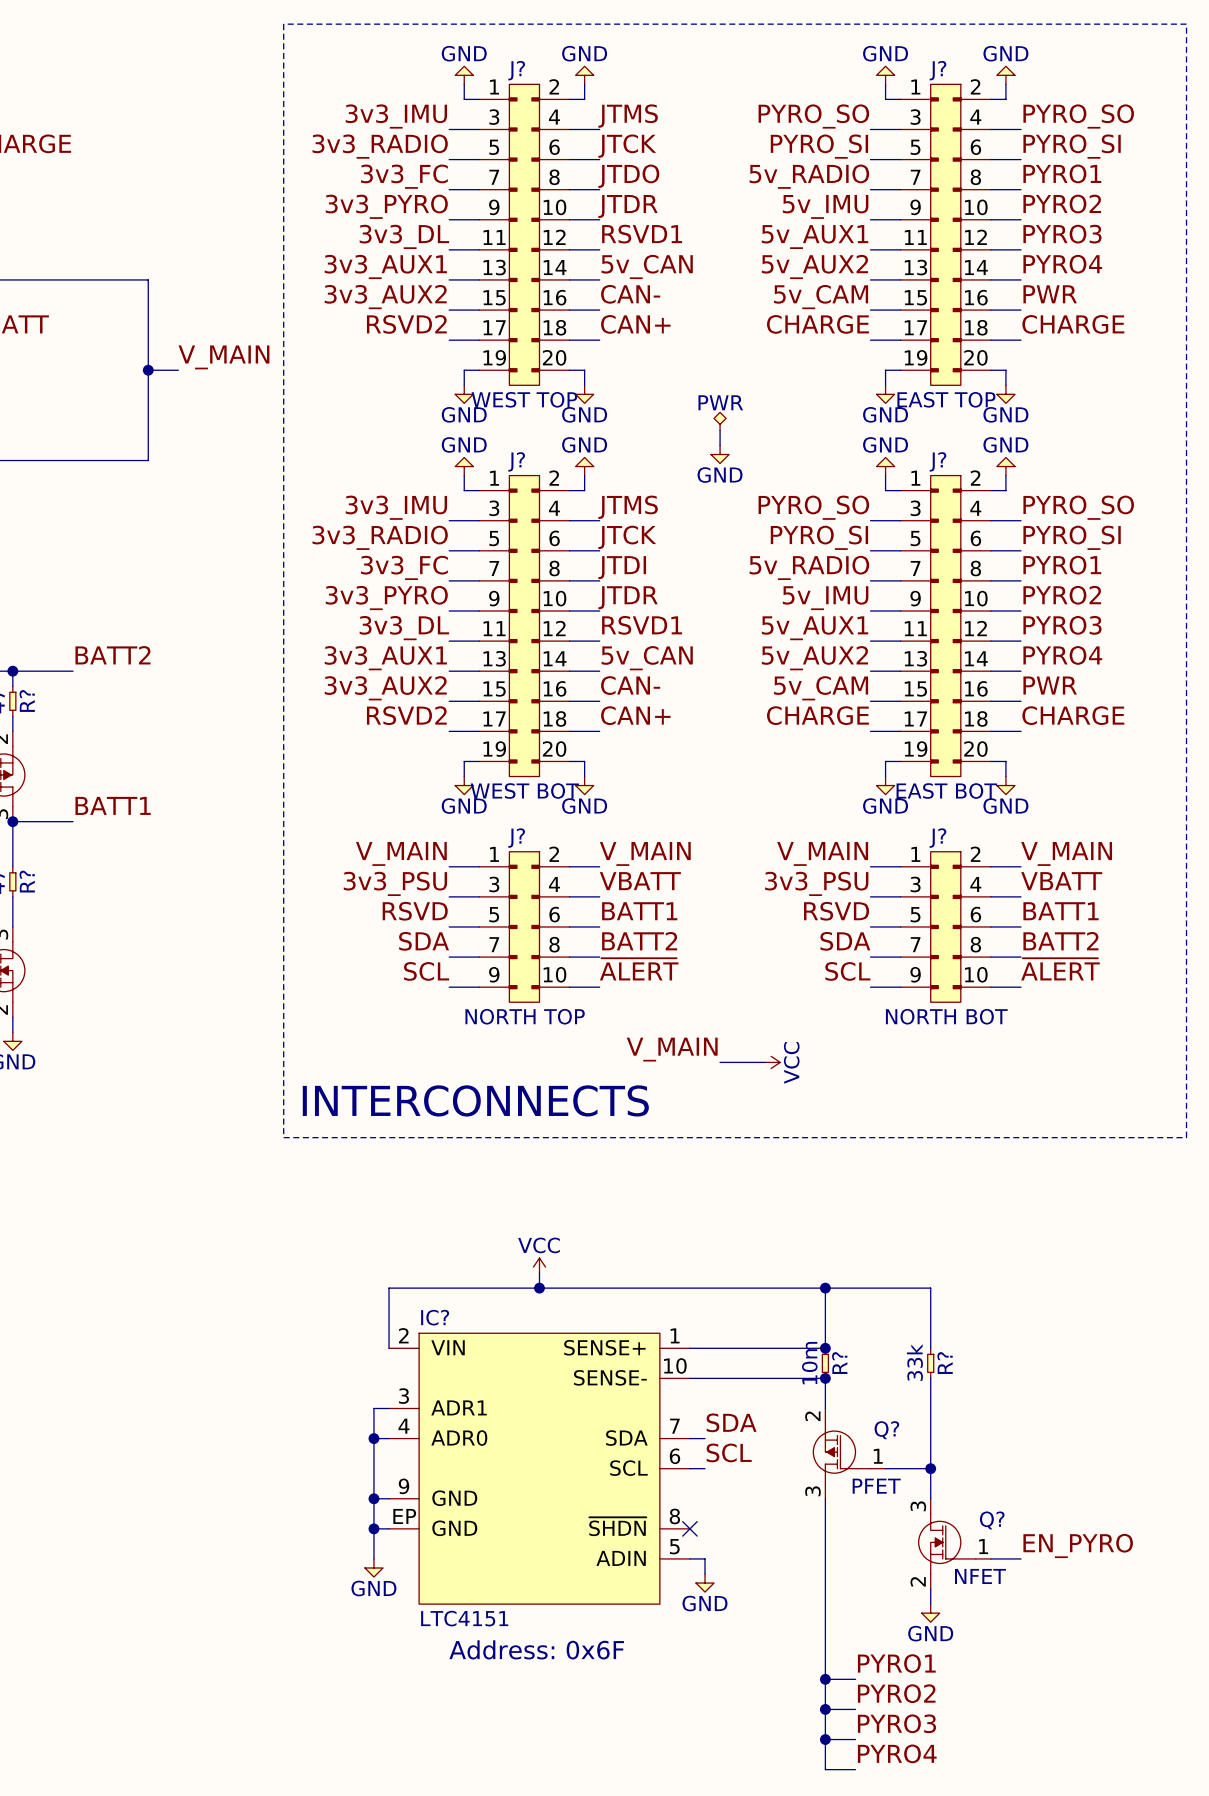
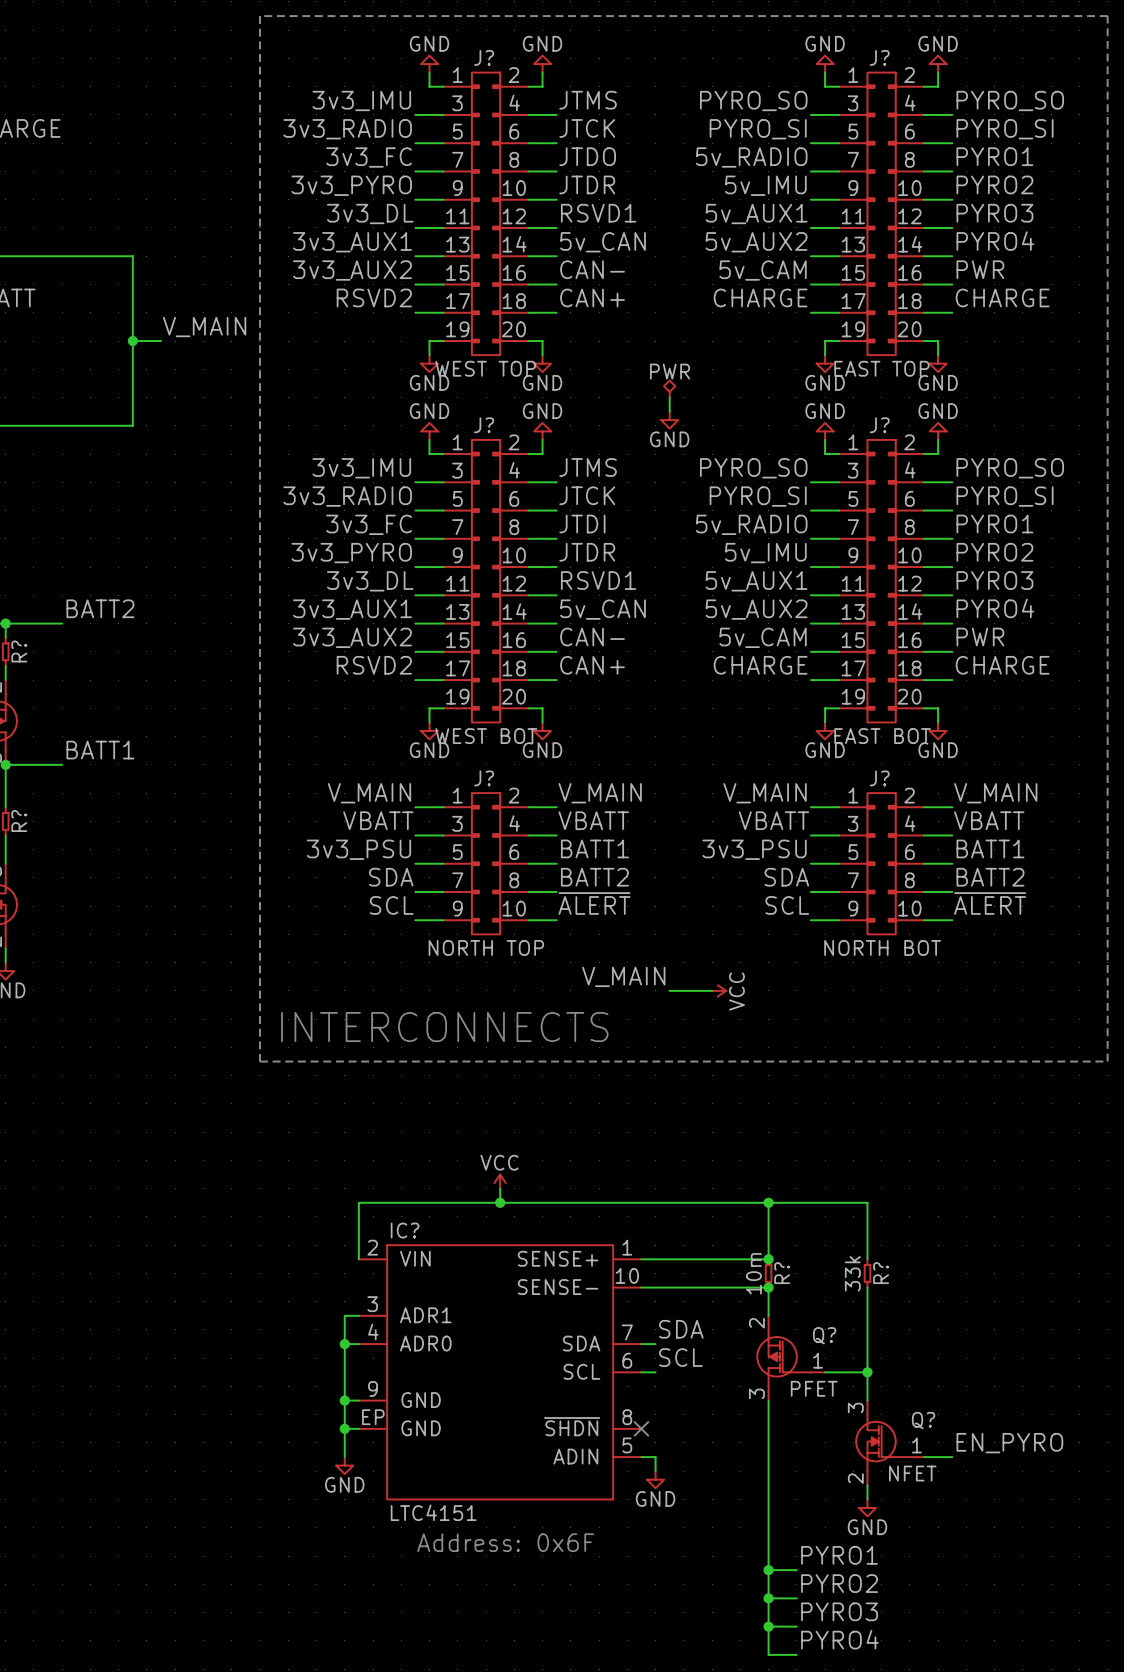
label: 3v3_PSU (395, 883) -> VBATT (378, 820)
label: 3v3_PSU (816, 883) -> VBATT (773, 820)
label: RSVD (415, 911) -> 3v3_PSU (358, 849)
label: RSVD (836, 911) -> 3v3_PSU (754, 849)

